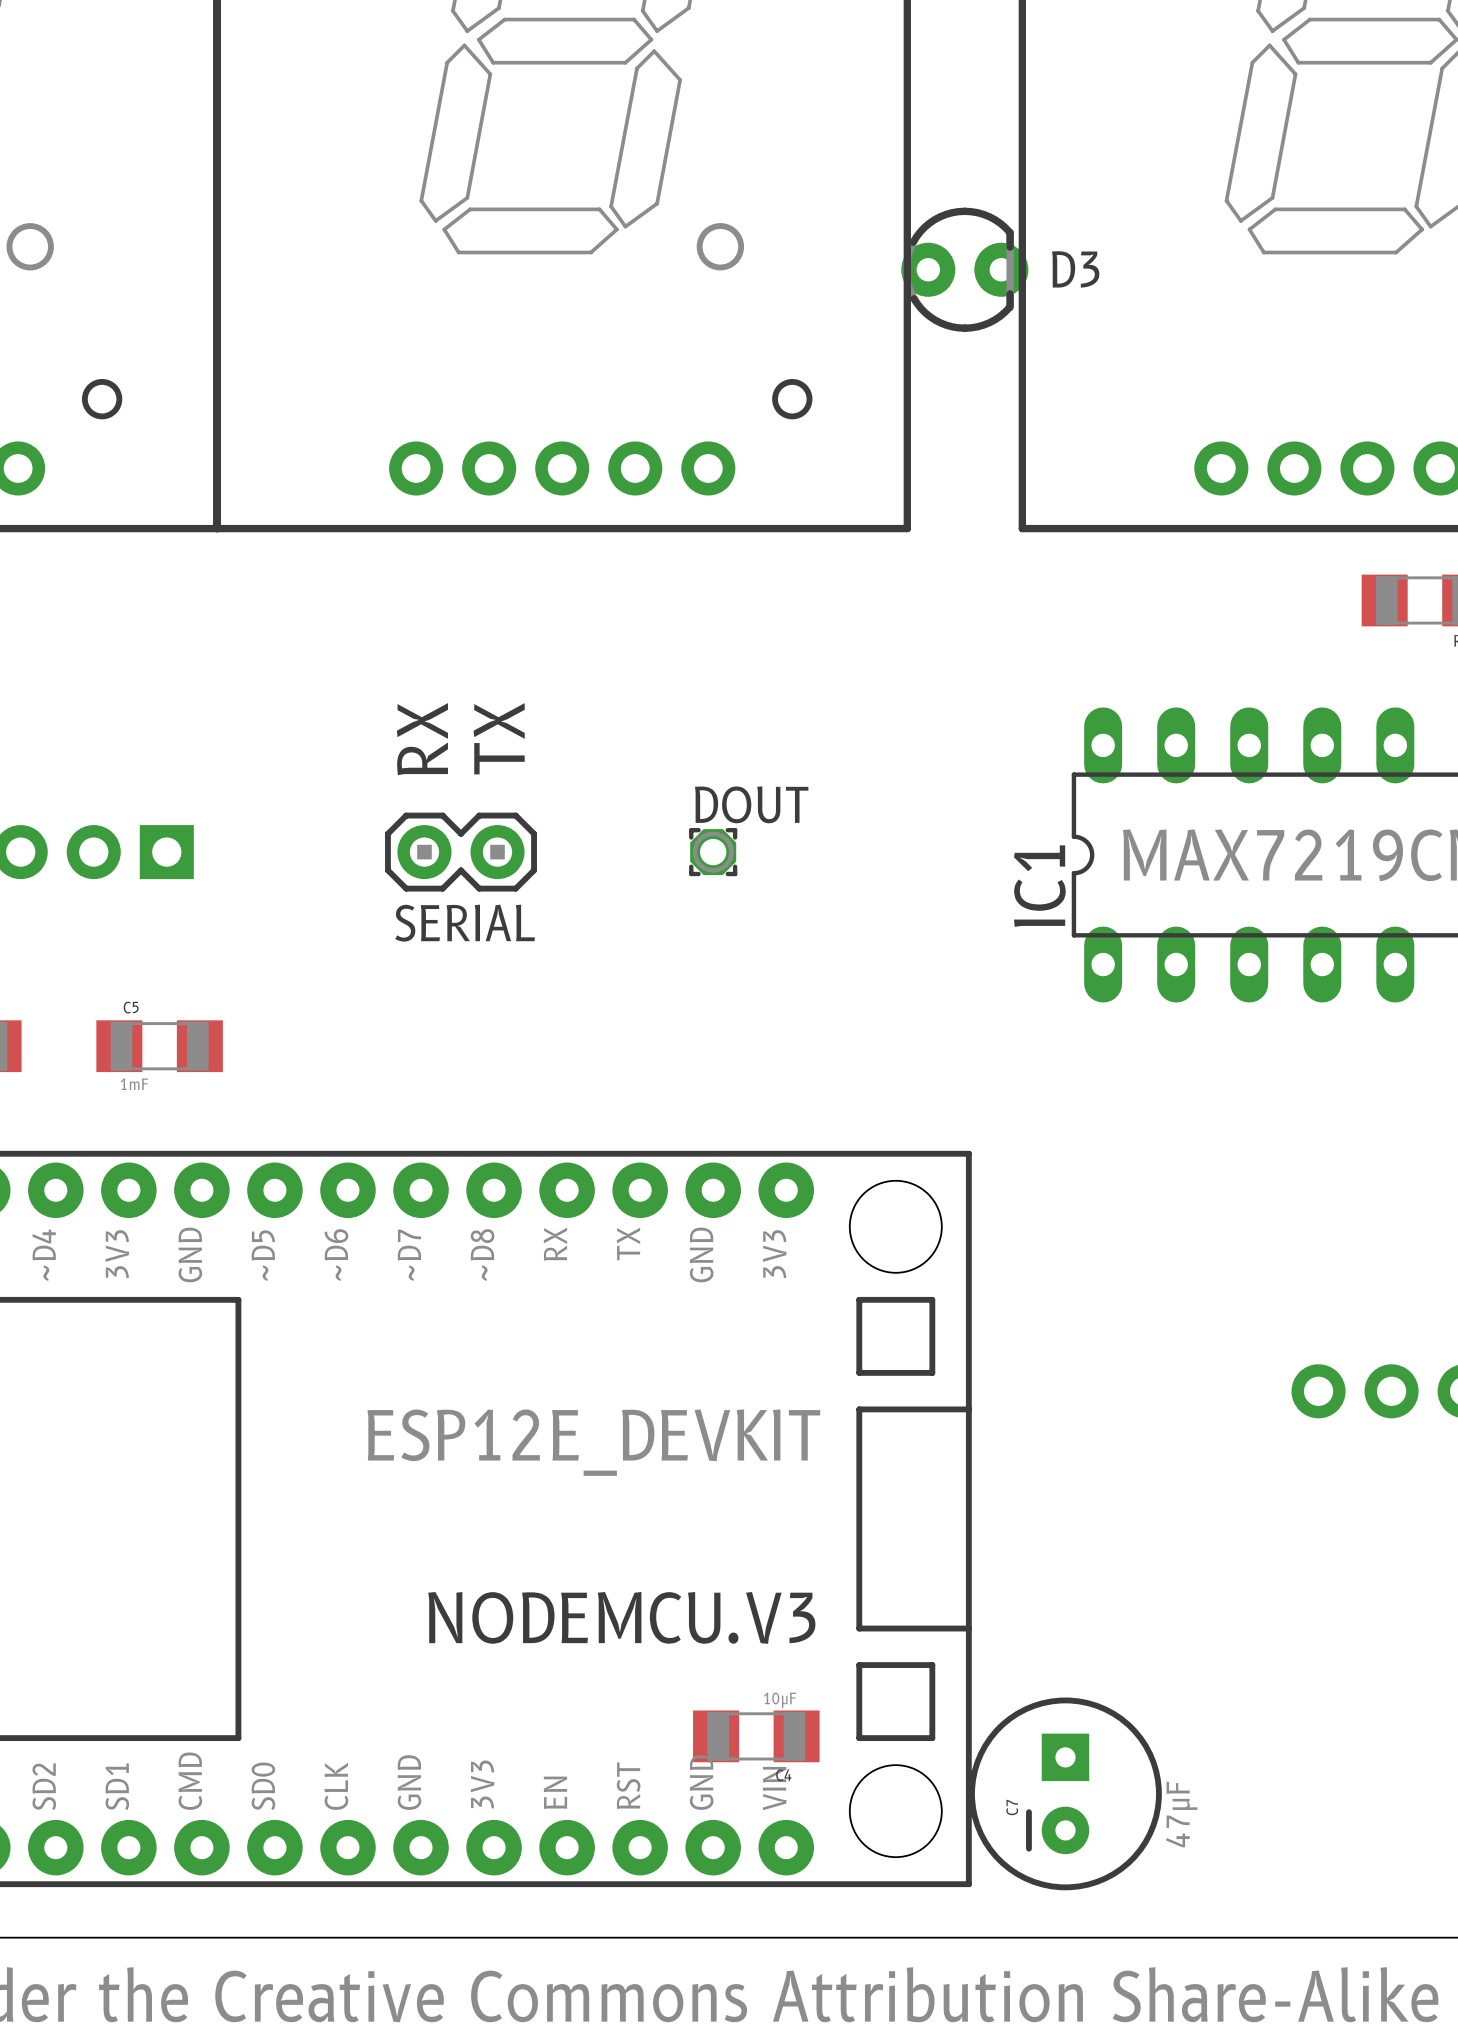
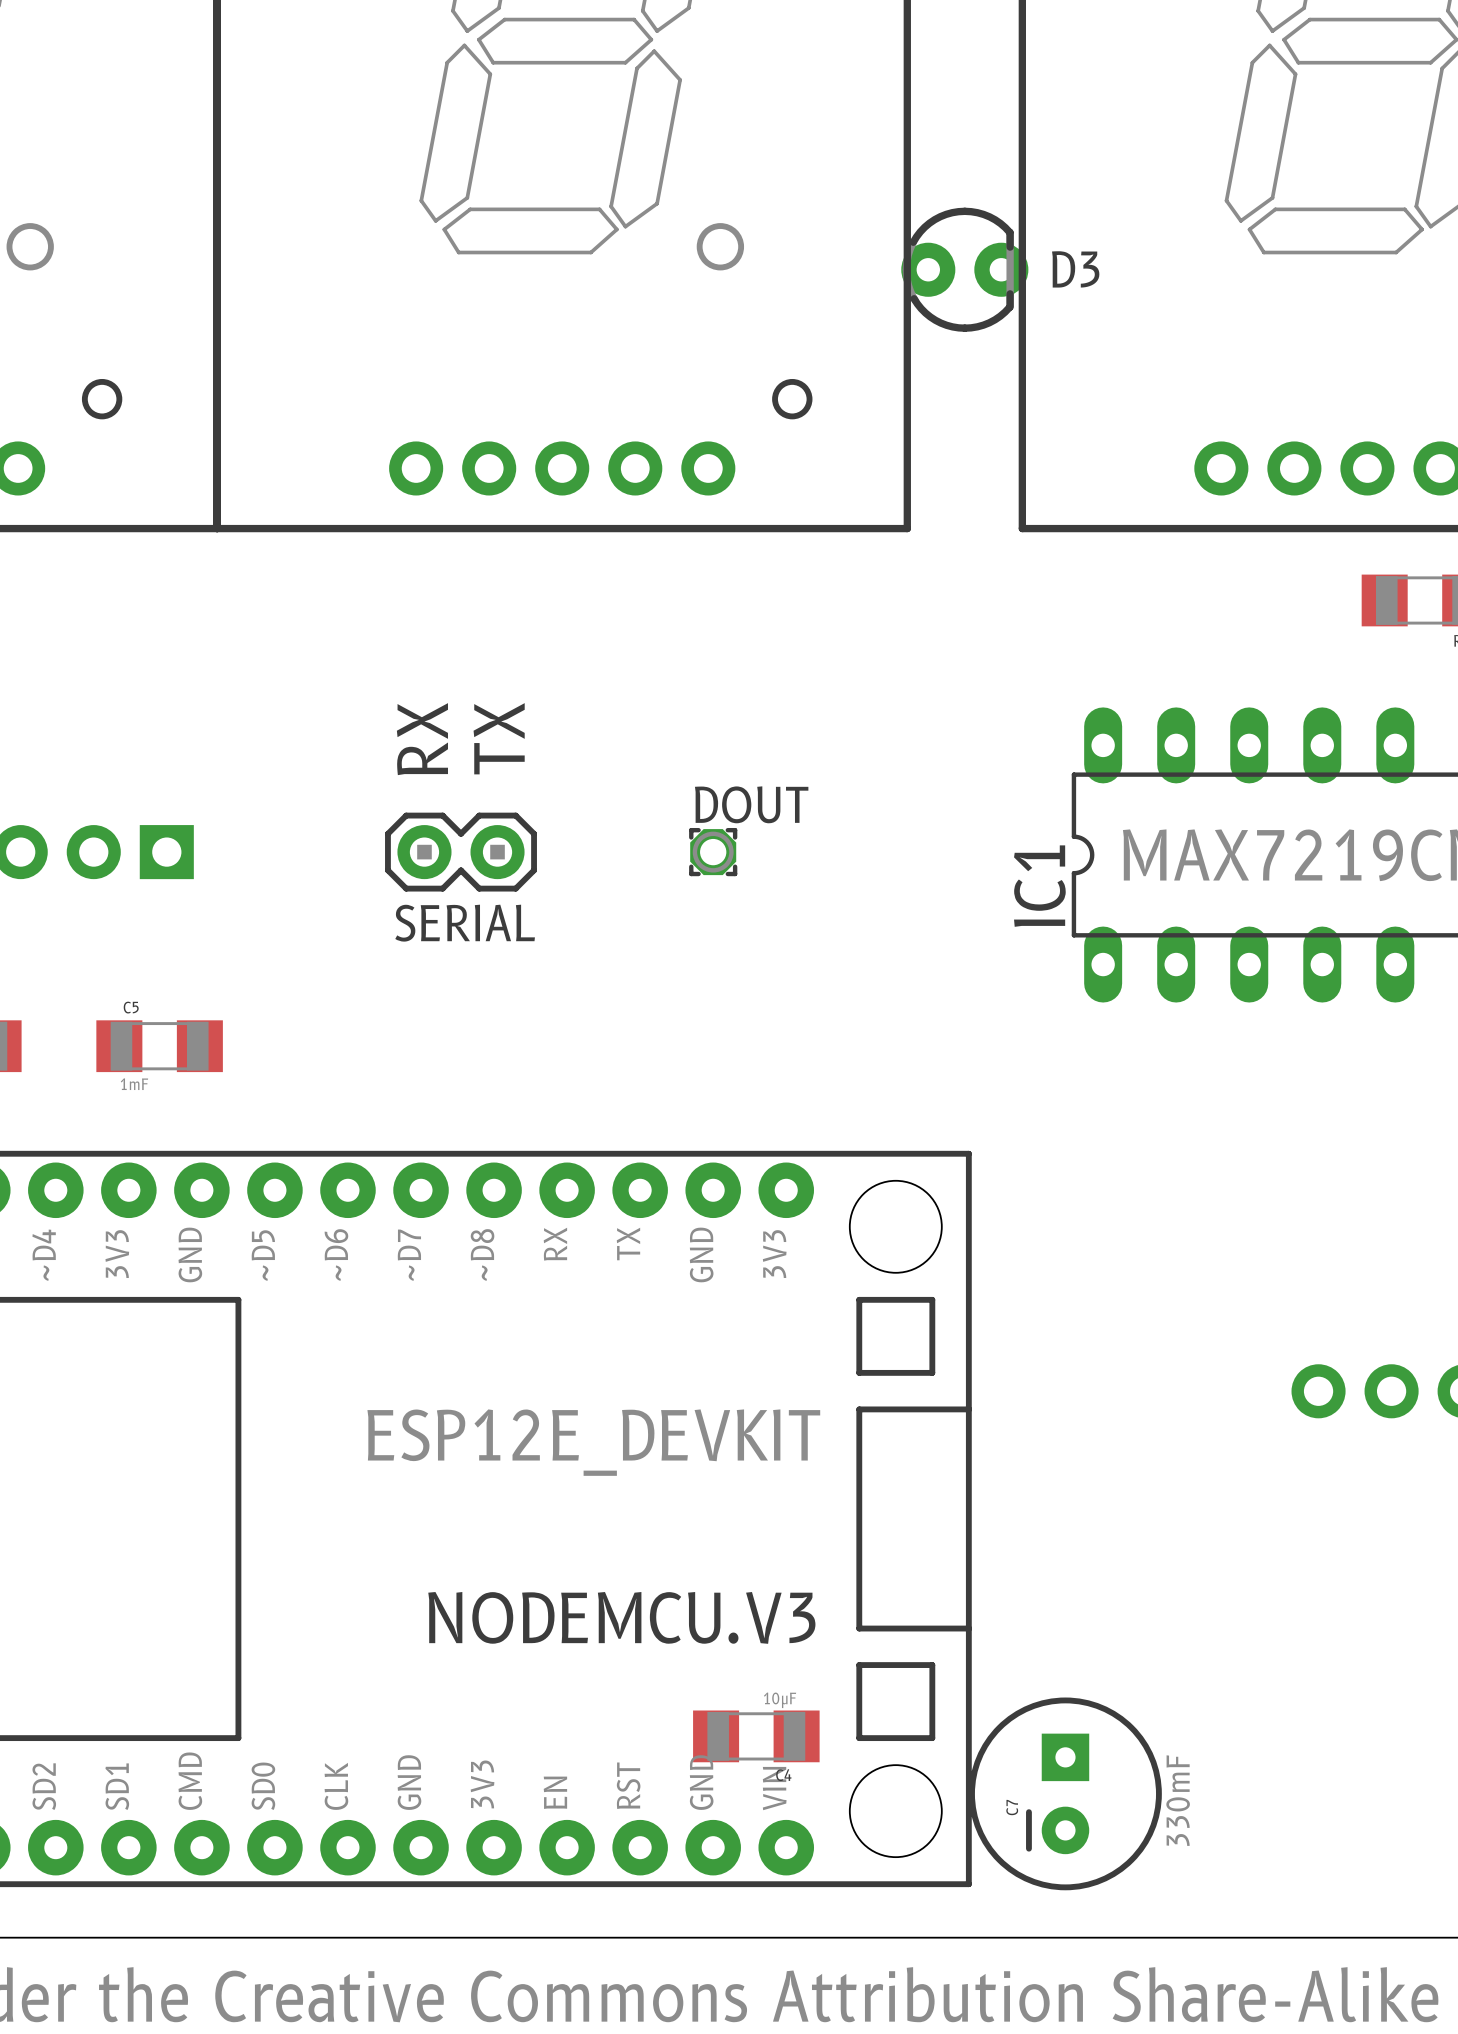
C7 value: 47μF (1181, 1814) -> 330mF (1178, 1800)

